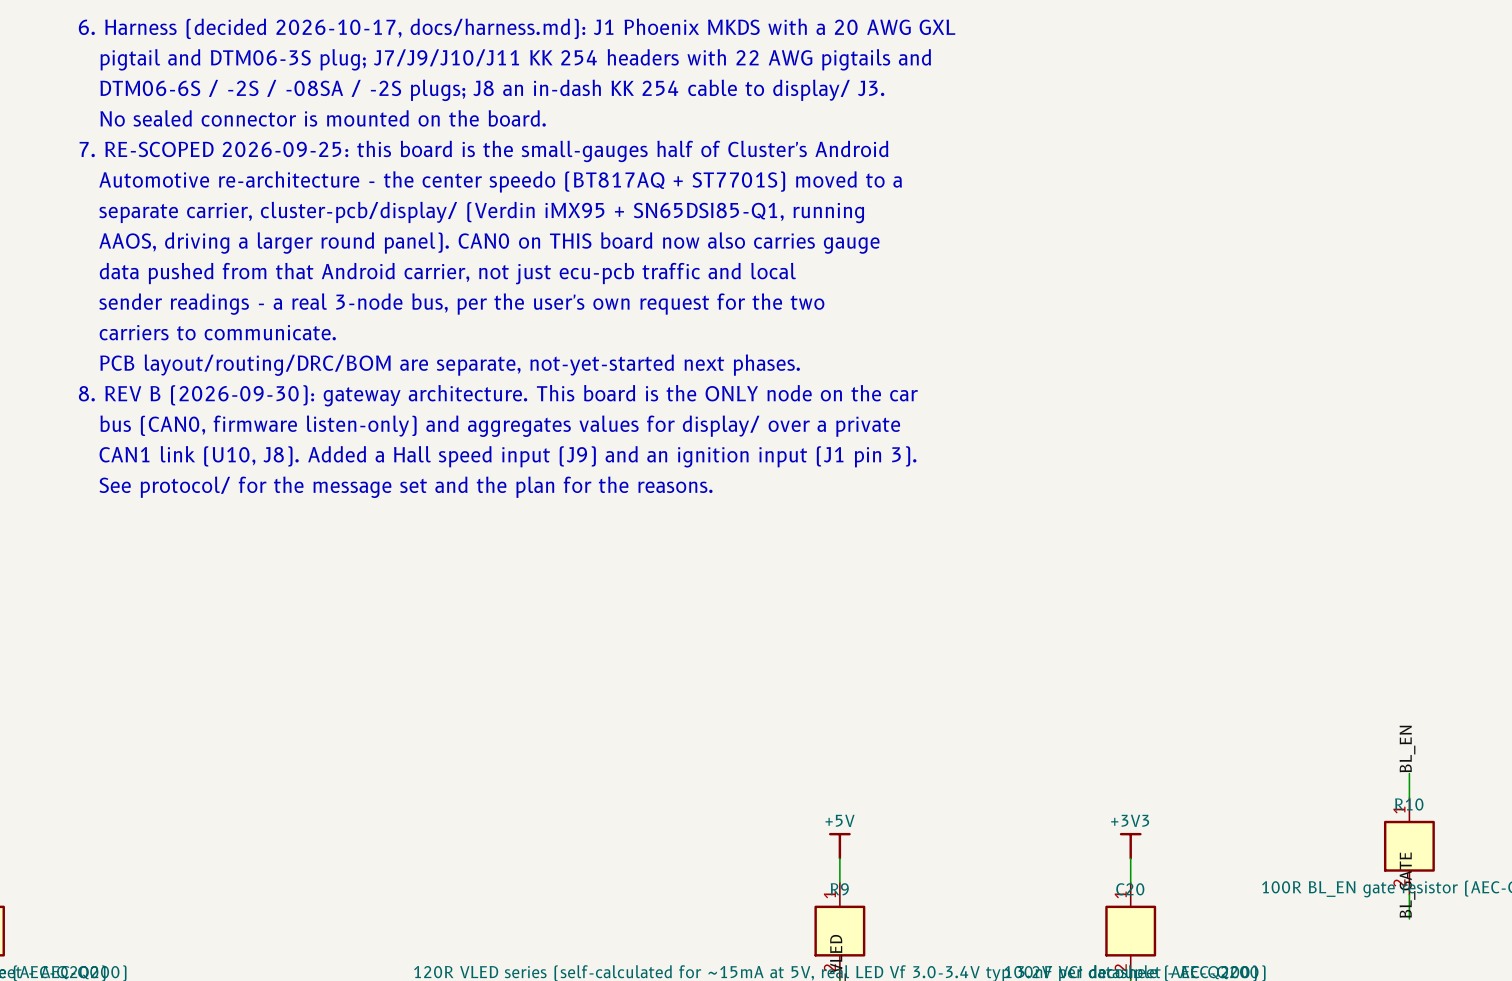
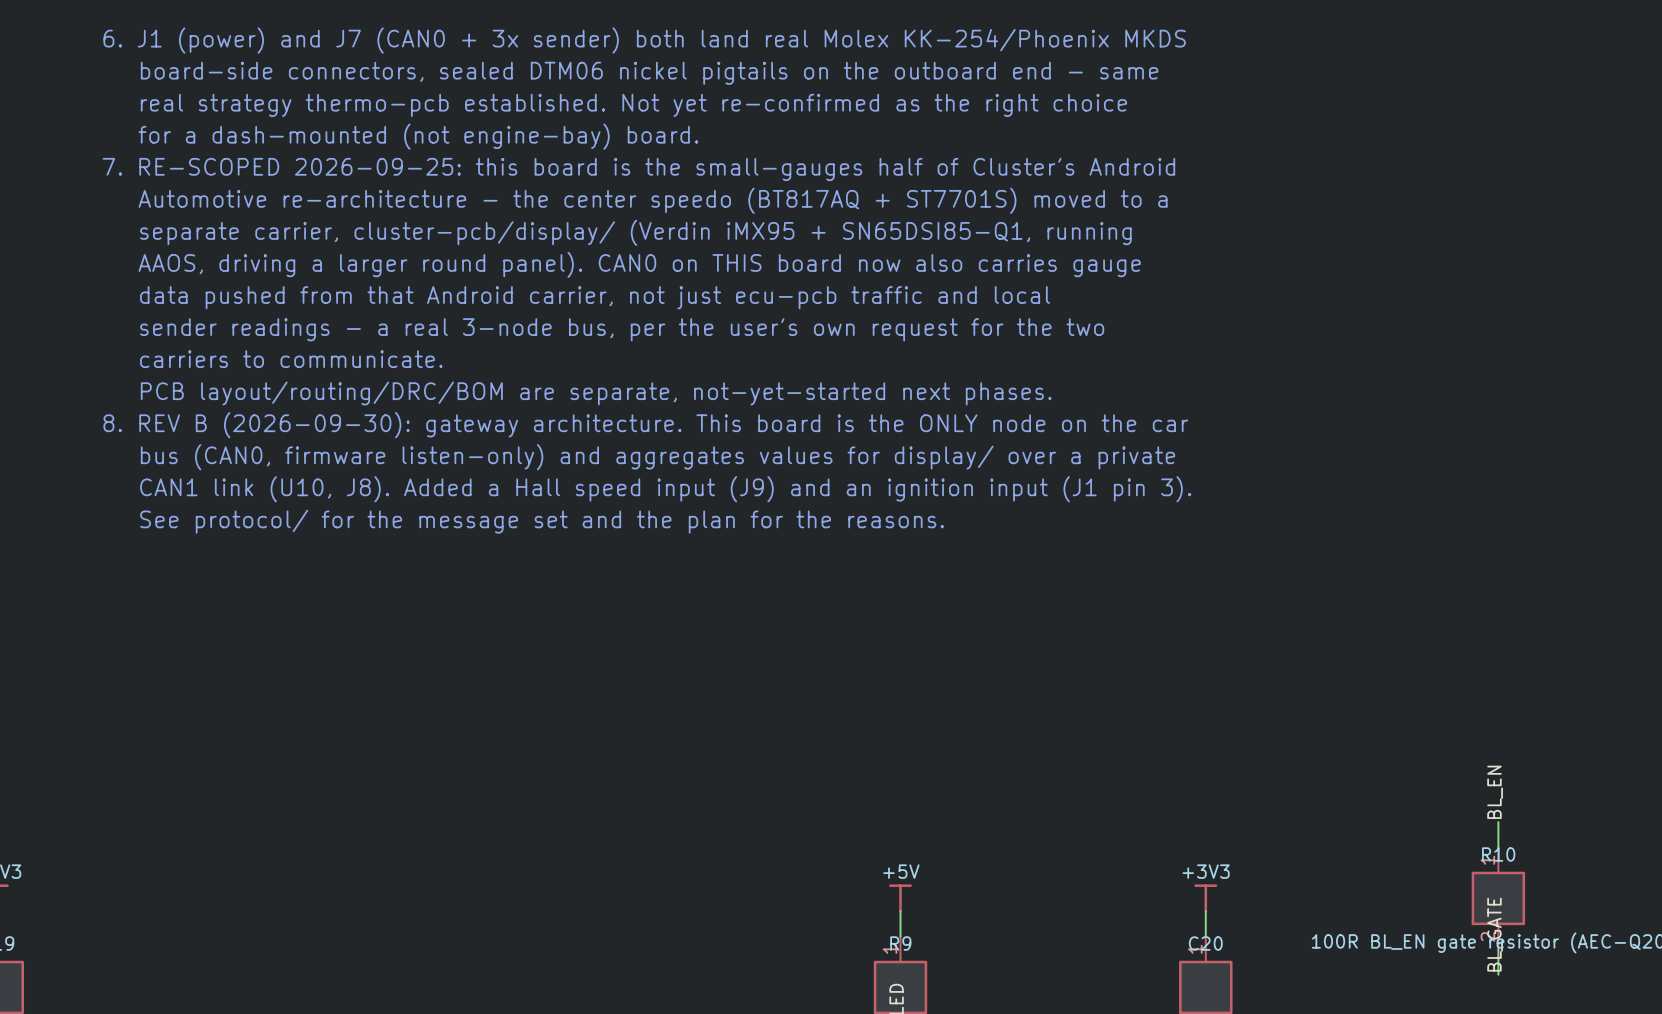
text: 6. Harness (decided 2026-10-17, docs/harness.md): J1 Phoenix MKDS with a 20 AWG GXL (517, 28) -> 6. J1 (power) and J7 (CAN0 + 3x sender) both land real Molex KK-254/Phoenix MKDS (644, 40)
text: pigtail and DTM06-3S plug; J7/J9/J10/J11 KK 254 headers with 22 AWG pigtails and (515, 59) -> board-side connectors, sealed DTM06 nickel pigtails on the outboard end - same (649, 73)
text: DTM06-6S / -2S / -08SA / -2S plugs; J8 an in-dash KK 254 cable to display/ J3. (492, 90) -> real strategy thermo-pcb established. Not yet re-confirmed as the right choice (633, 105)
text: No sealed connector is mounted on the board. (323, 118) -> for a dash-mounted (not engine-bay) board. (418, 136)

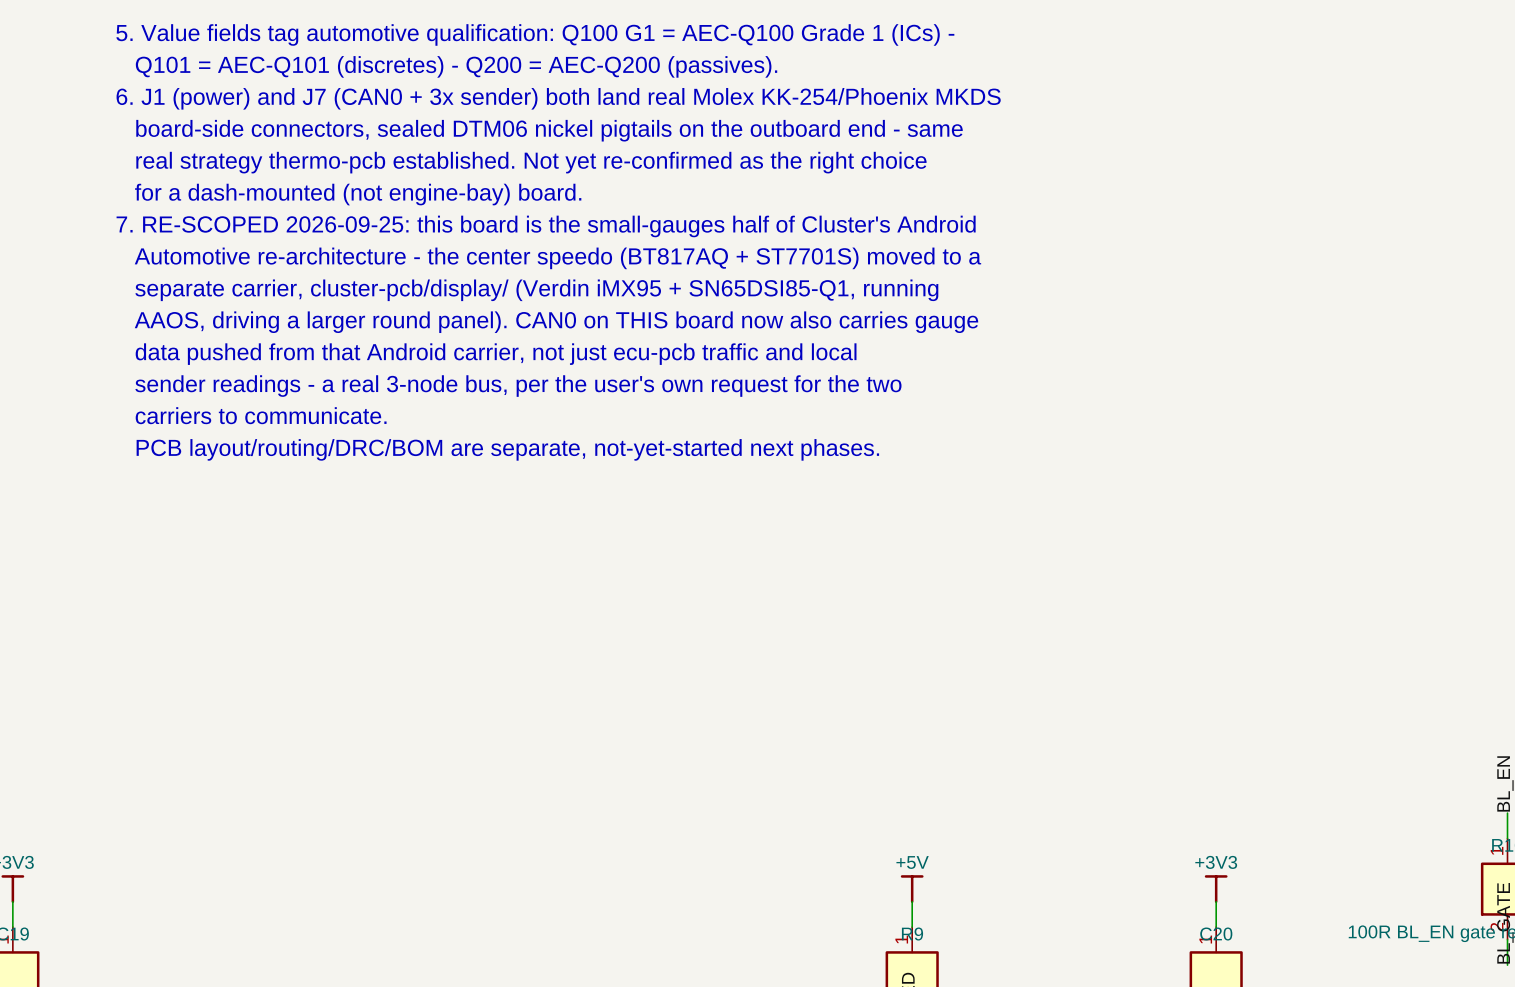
text: 6. J1 (power) and J7 (CAN0 + 3x sender) both land real Molex KK-254/Phoenix MKDS (644, 40) -> 5. Value fields tag automotive qualification: Q100 G1 = AEC-Q100 Grade 1 (ICs) - (535, 34)
text: board-side connectors, sealed DTM06 nickel pigtails on the outboard end - same (649, 73) -> Q101 = AEC-Q101 (discretes) - Q200 = AEC-Q200 (passives). (456, 66)
text: real strategy thermo-pcb established. Not yet re-confirmed as the right choice (633, 105) -> 6. J1 (power) and J7 (CAN0 + 3x sender) both land real Molex KK-254/Phoenix MKDS (558, 98)
text: for a dash-mounted (not engine-bay) board. (418, 136) -> board-side connectors, sealed DTM06 nickel pigtails on the outboard end - same (549, 130)
text: 7. RE-SCOPED 2026-09-25: this board is the small-gauges half of Cluster's Android (638, 169) -> real strategy thermo-pcb established. Not yet re-confirmed as the right choice (531, 162)
text: Automotive re-architecture - the center speedo (BT817AQ + ST7701S) moved to a (653, 200) -> for a dash-mounted (not engine-bay) board. (358, 194)
text: separate carrier, cluster-pcb/display/ (Verdin iMX95 + SN65DSI85-Q1, running (635, 232) -> 7. RE-SCOPED 2026-09-25: this board is the small-gauges half of Cluster's Android (546, 226)
text: AAOS, driving a larger round panel). CAN0 on THIS board now also carries gauge (639, 264) -> Automotive re-architecture - the center speedo (BT817AQ + ST7701S) moved to a (557, 258)
text: data pushed from that Android carrier, not just ecu-pcb traffic and local (595, 297) -> separate carrier, cluster-pcb/display/ (Verdin iMX95 + SN65DSI85-Q1, running (536, 290)
text: sender readings - a real 3-node bus, per the user's own request for the two (622, 329) -> AAOS, driving a larger round panel). CAN0 on THIS board now also carries gauge (556, 322)
text: carriers to communicate. (291, 359) -> data pushed from that Android carrier, not just ecu-pcb traffic and local (496, 354)
text: PCB layout/routing/DRC/BOM are separate, not-yet-started next phases. (596, 393) -> sender readings - a real 3-node bus, per the user's own request for the two (518, 386)
text: 8. REV B (2026-09-30): gateway architecture. This board is the ONLY node on the car (645, 425) -> carriers to communicate. (261, 415)
text: bus (CAN0, firmware listen-only) and aggregates values for display/ over a private (658, 457) -> PCB layout/routing/DRC/BOM are separate, not-yet-started next phases. (507, 449)
text: CAN1 link (U10, J8). Added a Hall speed input (J9) and an ignition input (J1 pin 3). (665, 489) -> none
text: See protocol/ for the message set and the plan for the reasons. (542, 521) -> none

